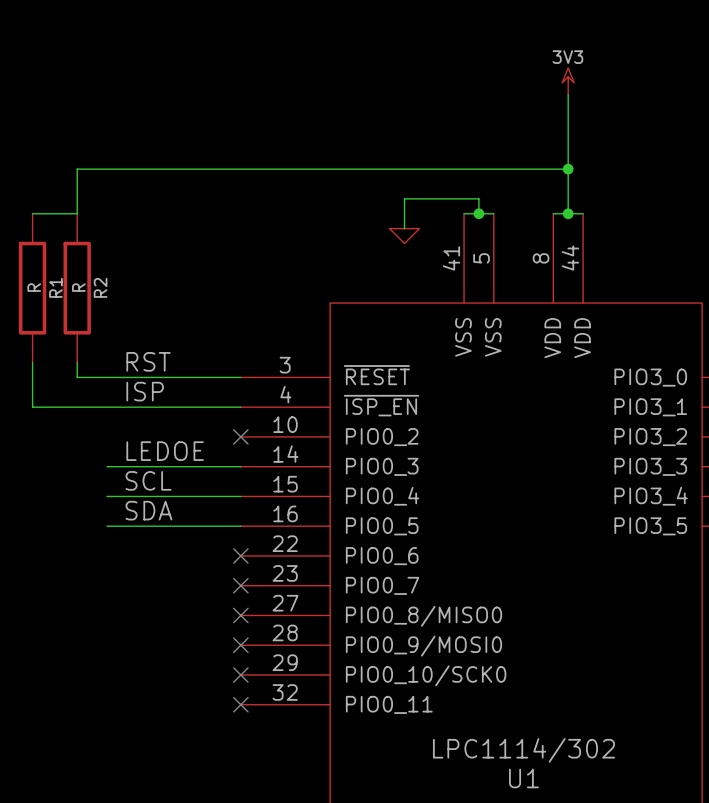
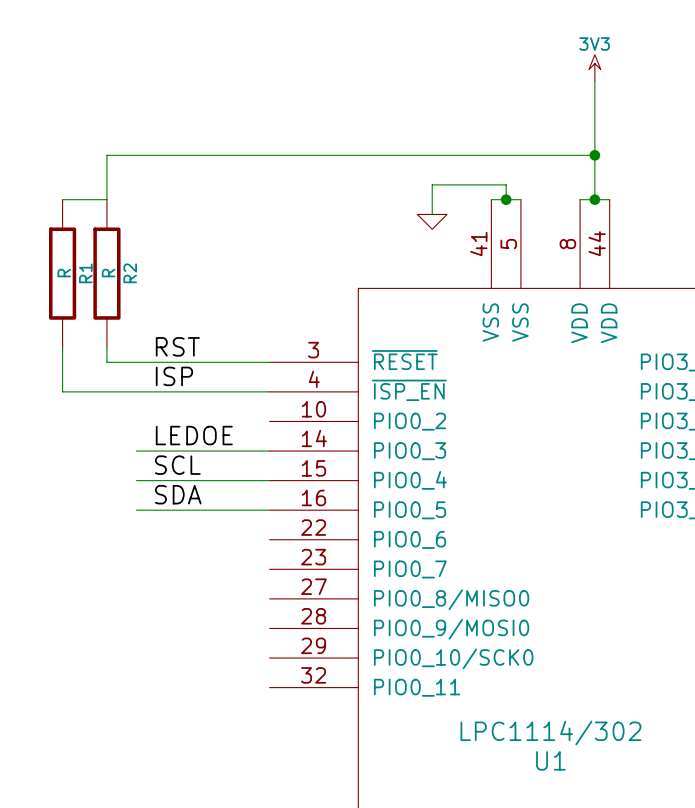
no-connect mark: (240, 436) -> none
no-connect mark: (240, 555) -> none
no-connect mark: (240, 585) -> none
no-connect mark: (240, 615) -> none
no-connect mark: (240, 645) -> none
no-connect mark: (240, 674) -> none
no-connect mark: (240, 704) -> none

